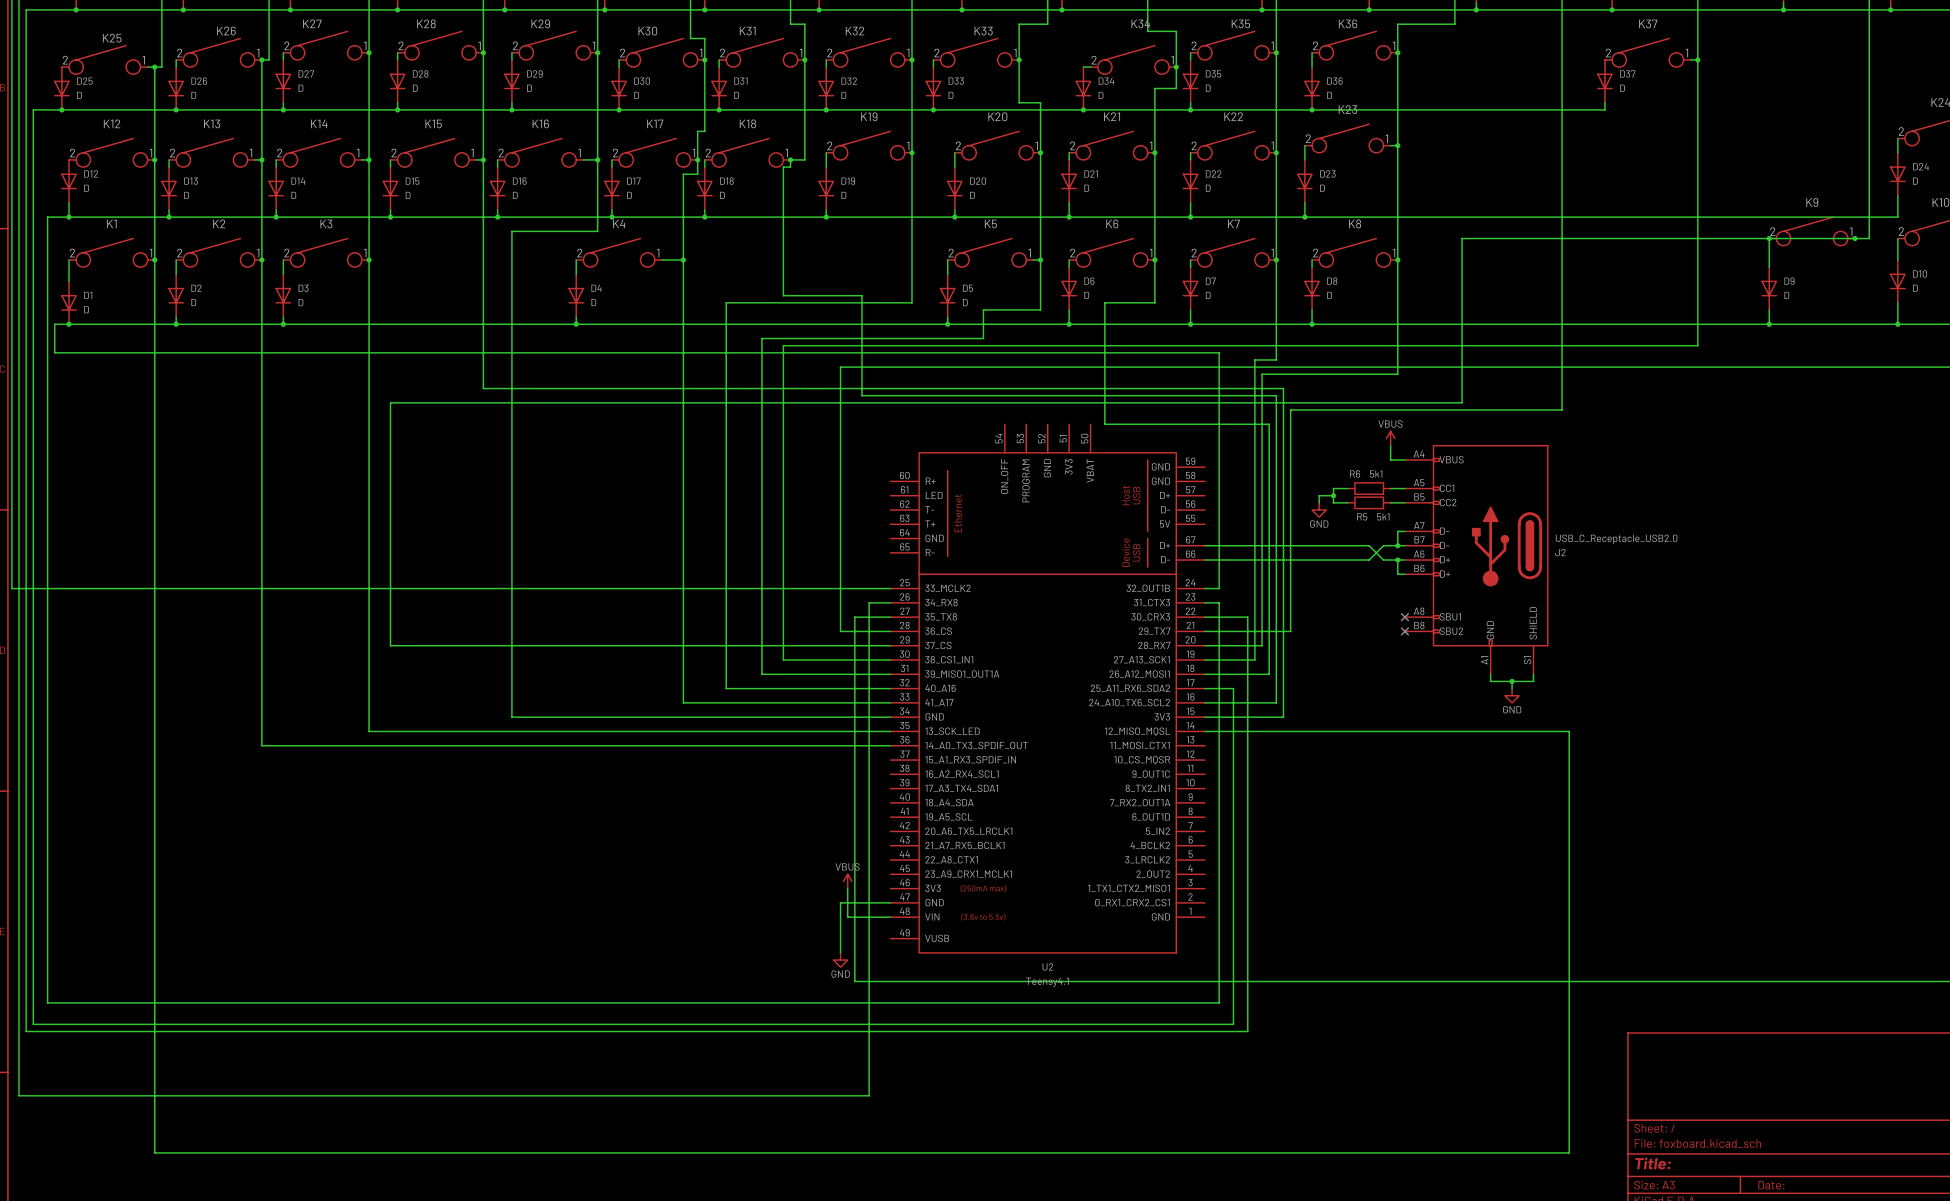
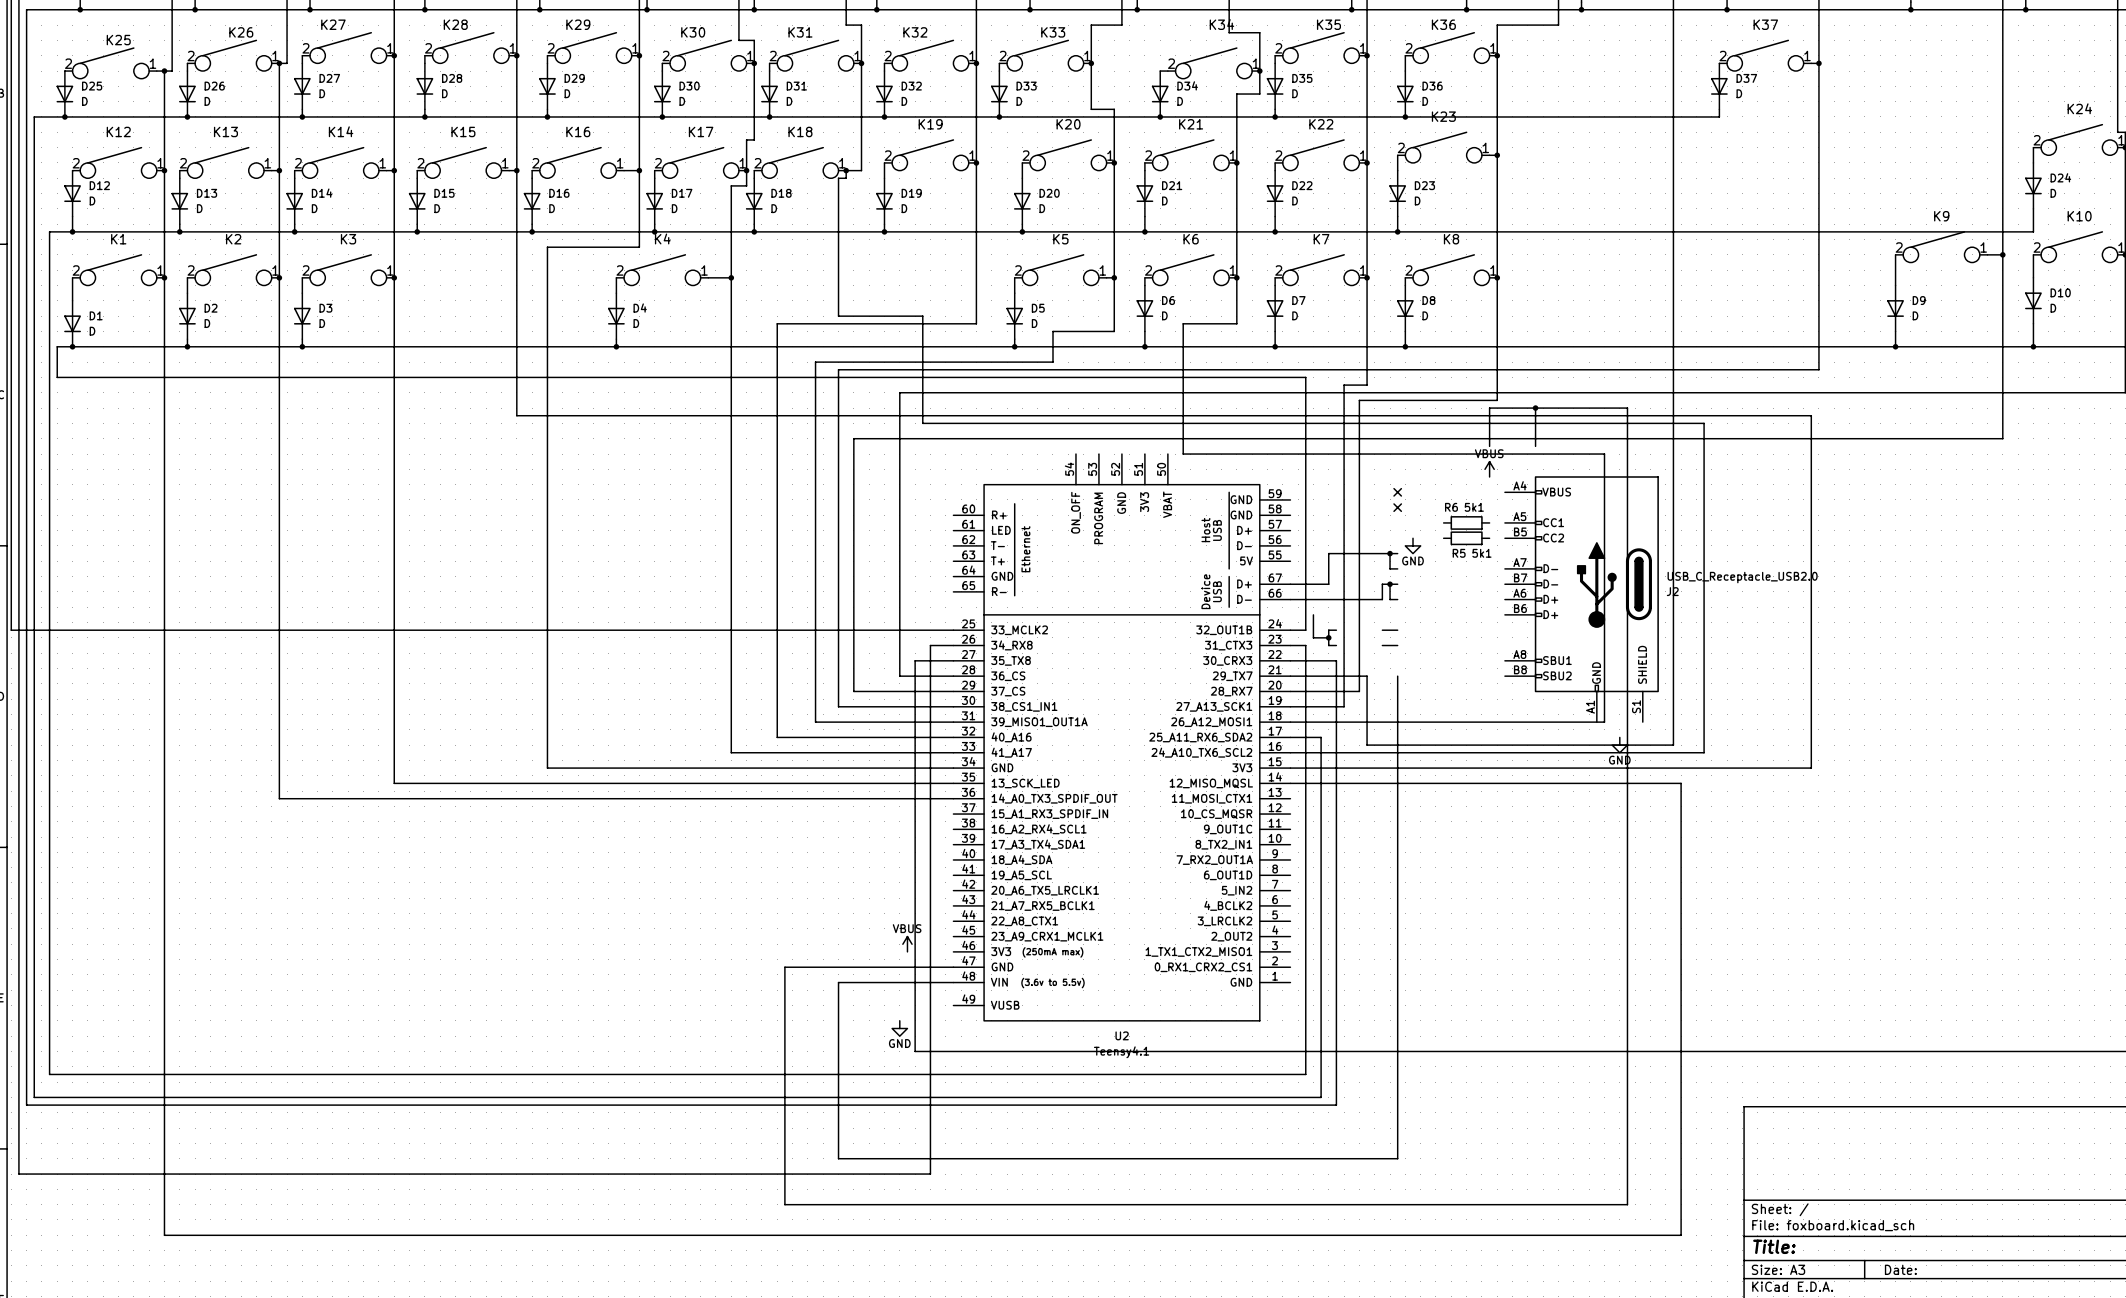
junction: (1769, 238) -> none
wire: (1854, 238) (1462, 238) (1462, 402) (390, 402) (390, 645) (797, 645) -> (1382, 438) (853, 438) (853, 691)
junction position: (1854, 238) -> (2002, 254)
wire: (1269, 374) (1262, 374) (1262, 645) -> (1359, 400) (1359, 454) (1604, 454) (1604, 722) (1359, 722)
wire: none -> (1535, 408) (1535, 446)
junction: none -> (1535, 408)
wire: (1283, 388) (1283, 717) -> (1374, 415) (1811, 415) (1811, 768) (1374, 768)
wire: (1276, 395) (1276, 631) (1290, 631) (1290, 560) (1297, 560) -> (1367, 423) (1704, 423) (1704, 752) (1367, 752)
wire: (1290, 409) (1290, 545) (1240, 545) -> (1397, 553) (1328, 553) (1328, 584)
wire: (1390, 445) (1390, 459) (1404, 459) -> none
no-connect mark: none -> (1397, 492)
no-connect mark: none -> (1397, 507)
wire: (1347, 488) (1333, 488) (1333, 502) (1347, 502) -> none
wire: (1390, 488) (1404, 488) -> none
wire: (1333, 495) (1319, 495) (1319, 502) -> none
junction: (1333, 495) -> none
wire: (1390, 502) (1404, 502) -> (1382, 630) (1397, 630)
junction: none -> (1390, 553)
wire: (1404, 531) (1397, 531) (1397, 545) -> none
wire: none -> (1390, 584) (1390, 599)
junction: none -> (1390, 584)
wire: (1304, 545) (1369, 545) (1383, 560) (1404, 560) -> none
junction: (1397, 545) -> none
wire: (1404, 545) (1383, 545) (1369, 560) (1304, 560) -> none
wire: (1397, 560) (1397, 574) (1404, 574) -> (1390, 553) (1390, 568) (1397, 568)
junction: (1397, 560) -> none
wire: none -> (1313, 614) (1313, 637) (1328, 637)
wire: none -> (1336, 630) (1328, 630) (1328, 645) (1336, 645)
junction: none -> (1328, 637)
wire: none -> (1382, 645) (1397, 645)
no-connect mark: (1404, 617) -> none
no-connect mark: (1404, 631) -> none
wire: (1269, 645) (1269, 674) -> (1359, 691) (1351, 691)
wire: (1490, 674) (1490, 681) (1533, 681) (1533, 674) -> none
wire: (1512, 681) (1512, 688) -> none
junction: (1512, 681) -> none
wire: (1276, 695) (1276, 702) -> (1367, 745) (1673, 745) (1673, 438) (2002, 438) (2002, 254)
wire: (847, 888) (847, 917) -> (1397, 676) (1397, 1158) (838, 1158) (838, 982) (907, 982)
wire: (840, 902) (840, 952) -> (899, 967) (784, 967) (784, 1204) (1627, 1204) (1627, 408) (1489, 408) (1489, 446)

